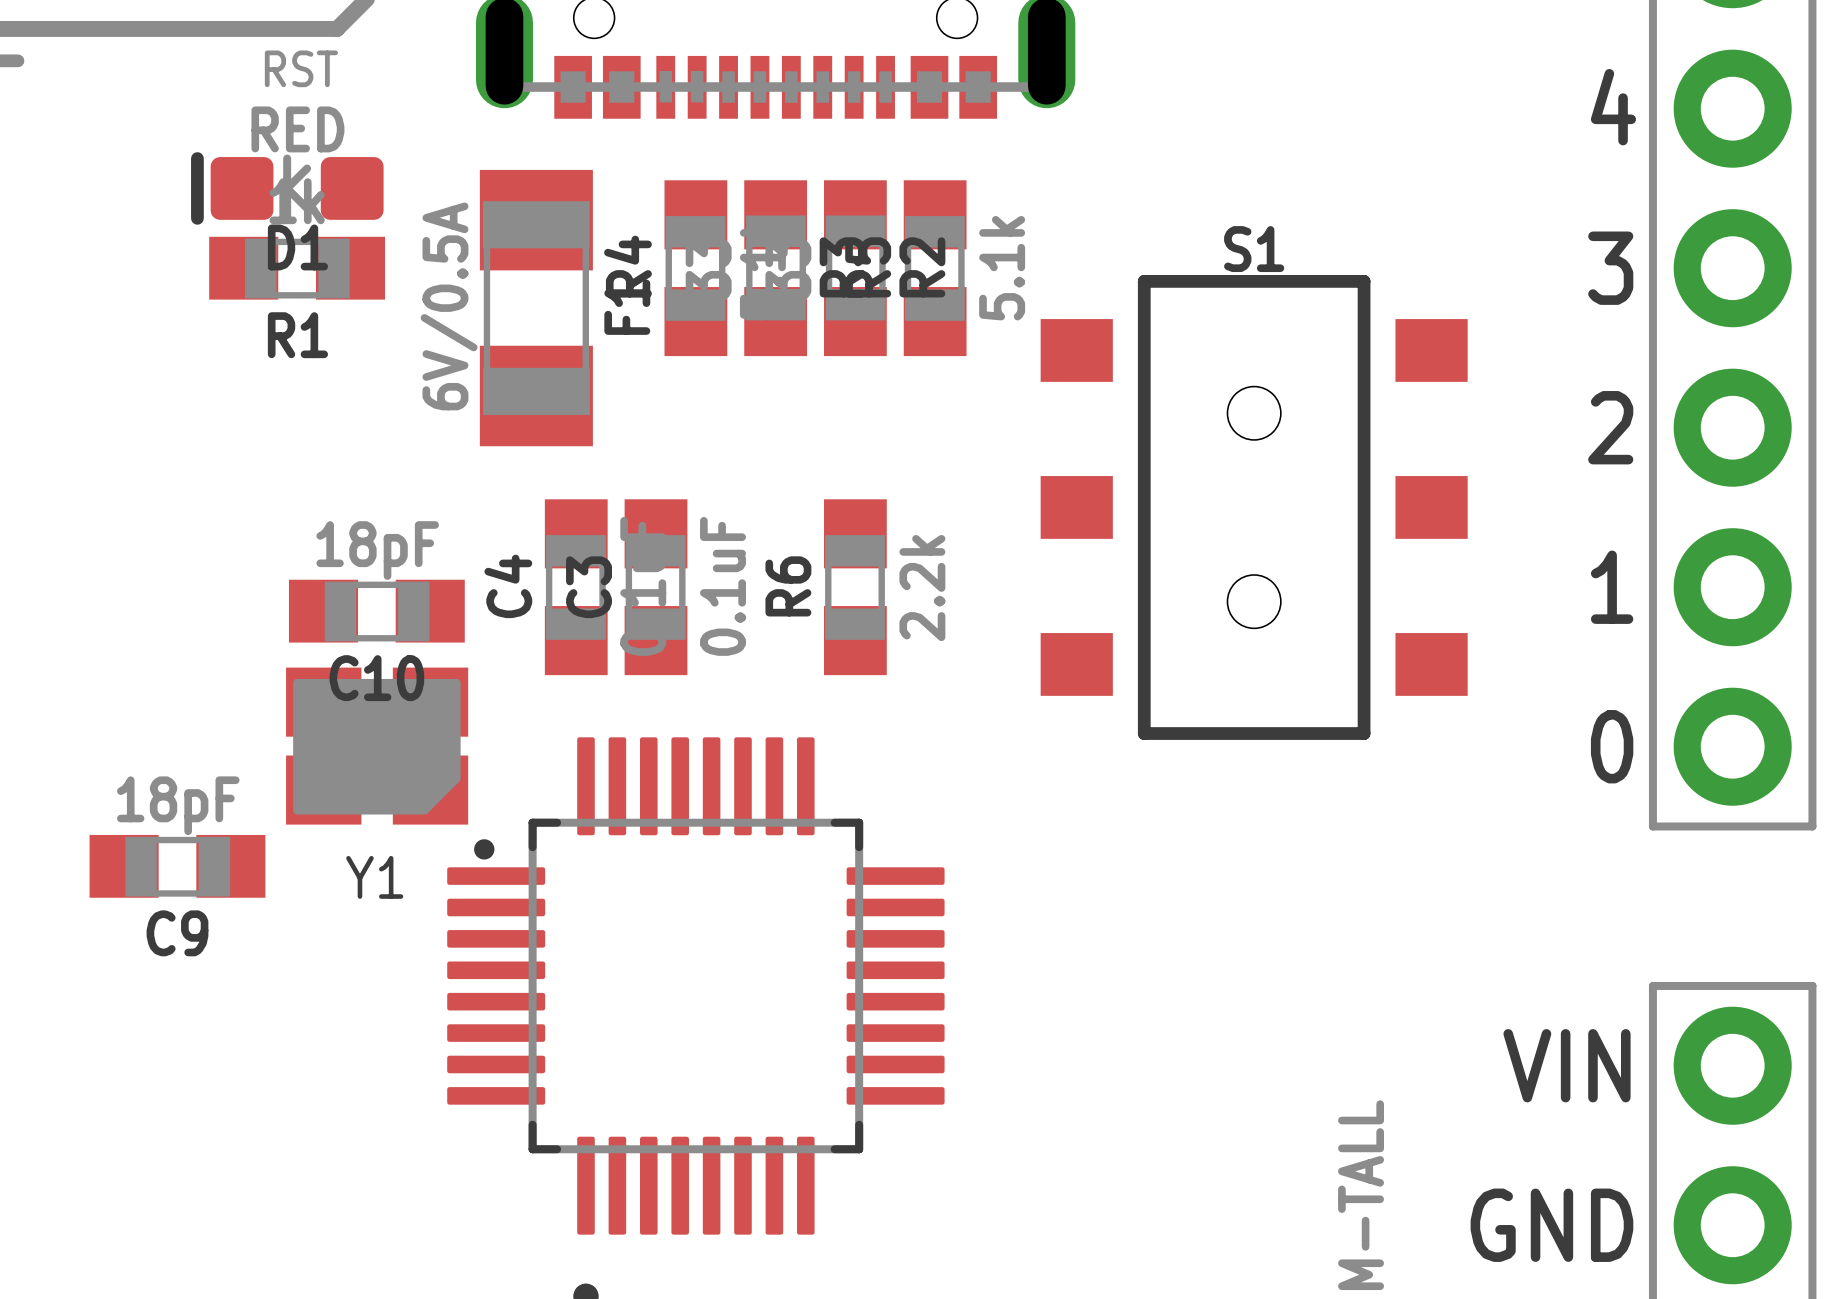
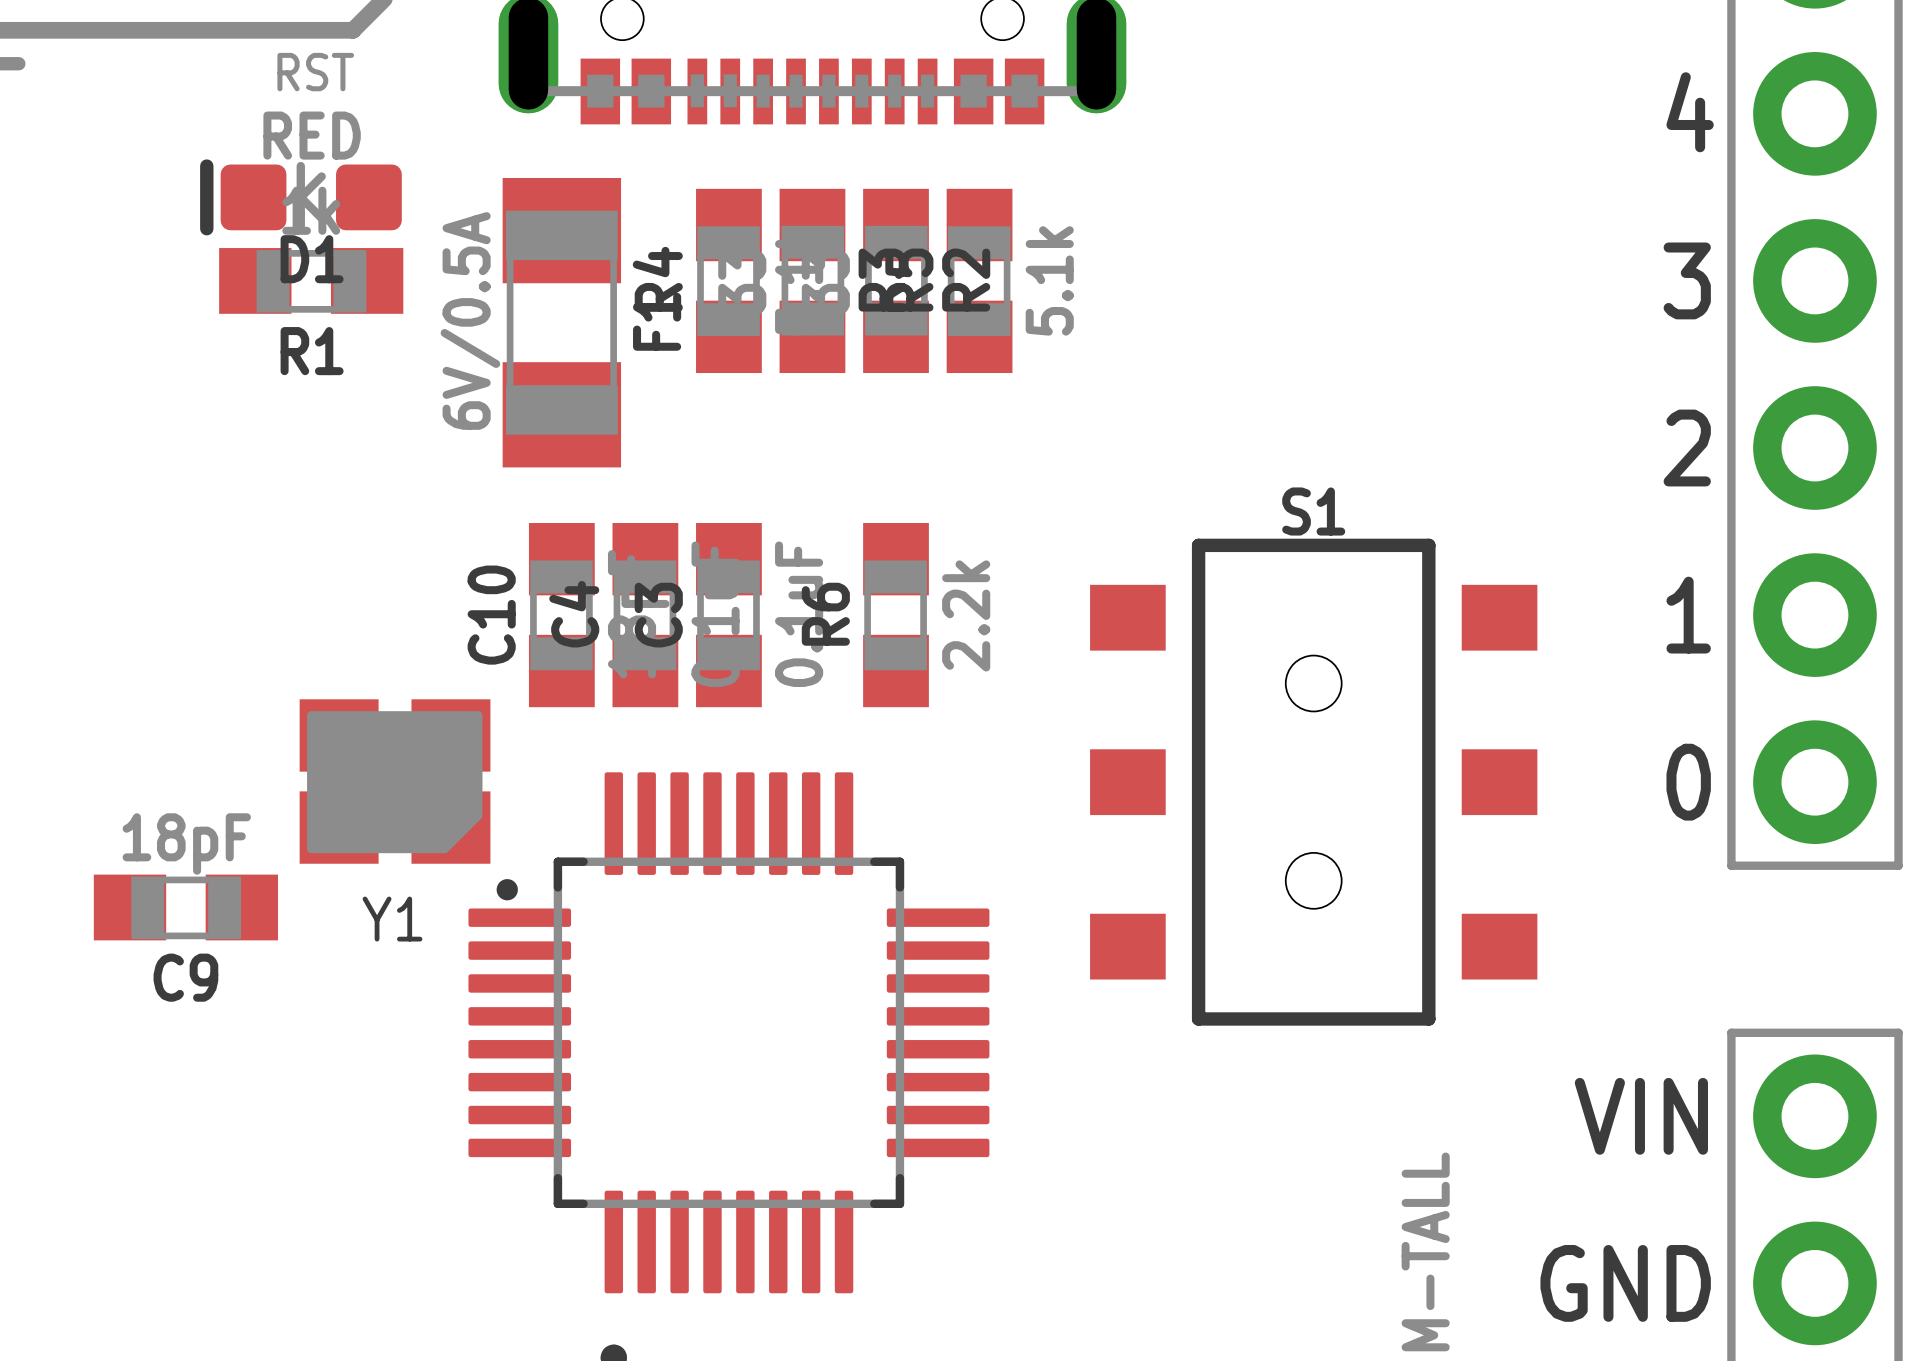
S1 position: (1254, 507) -> (1313, 782)
C4 position: (576, 587) -> (645, 615)
C3 position: (656, 587) -> (728, 615)
C10 rotation: 0° (376, 611) -> 90° clockwise (561, 615)
C10 position: (376, 611) -> (561, 615)

